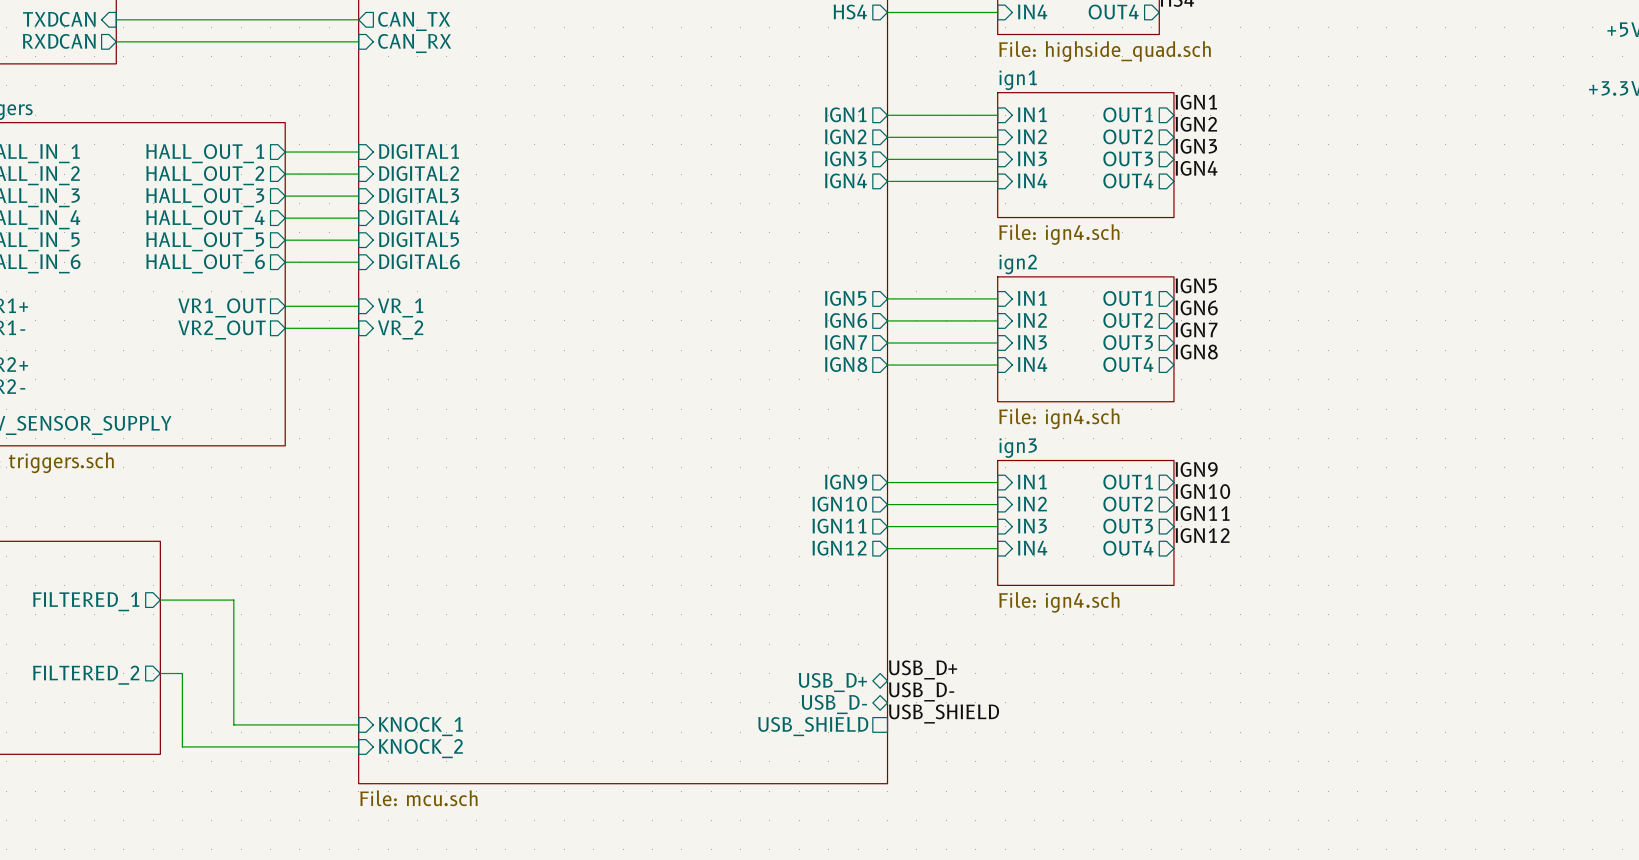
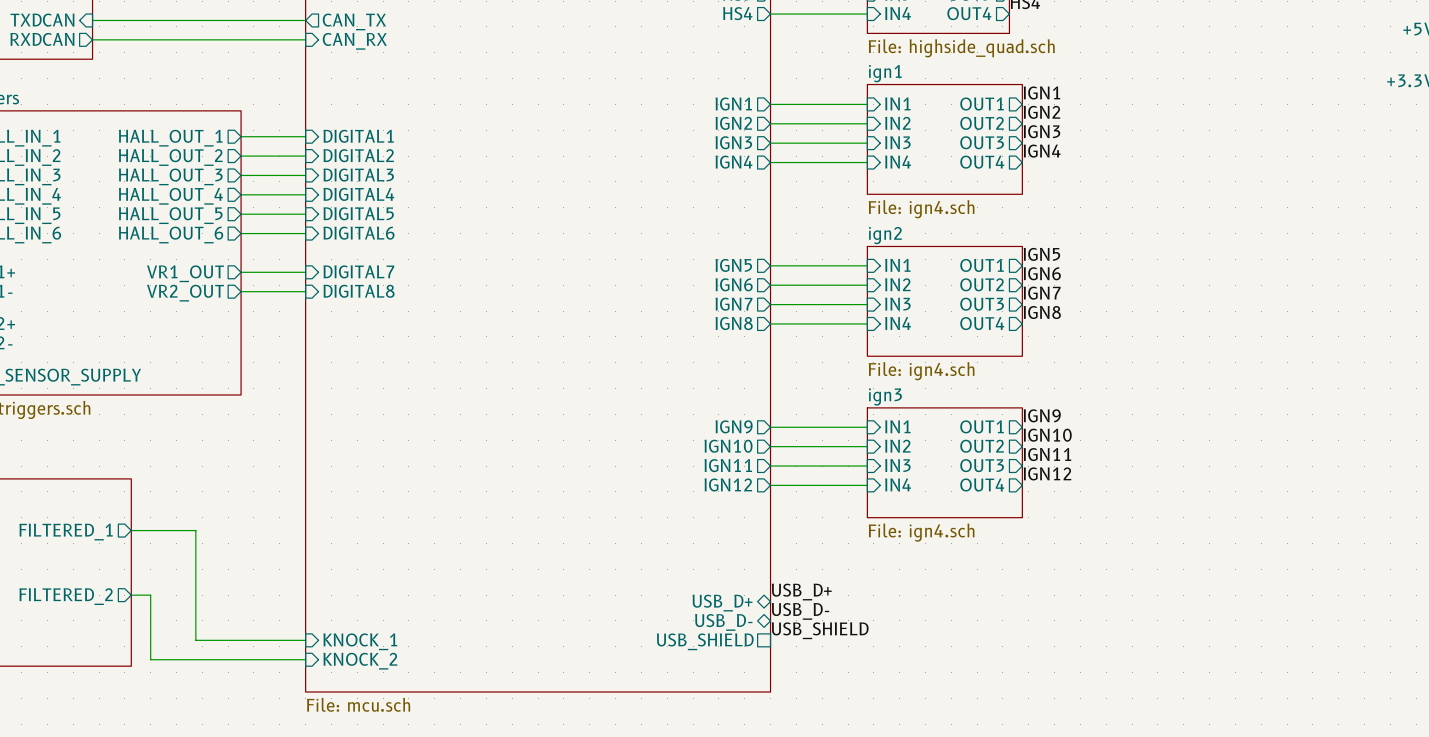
sheet pin: VR_1 (400, 307) -> DIGITAL7 (358, 271)
sheet pin: VR_2 (400, 329) -> DIGITAL8 (358, 291)

